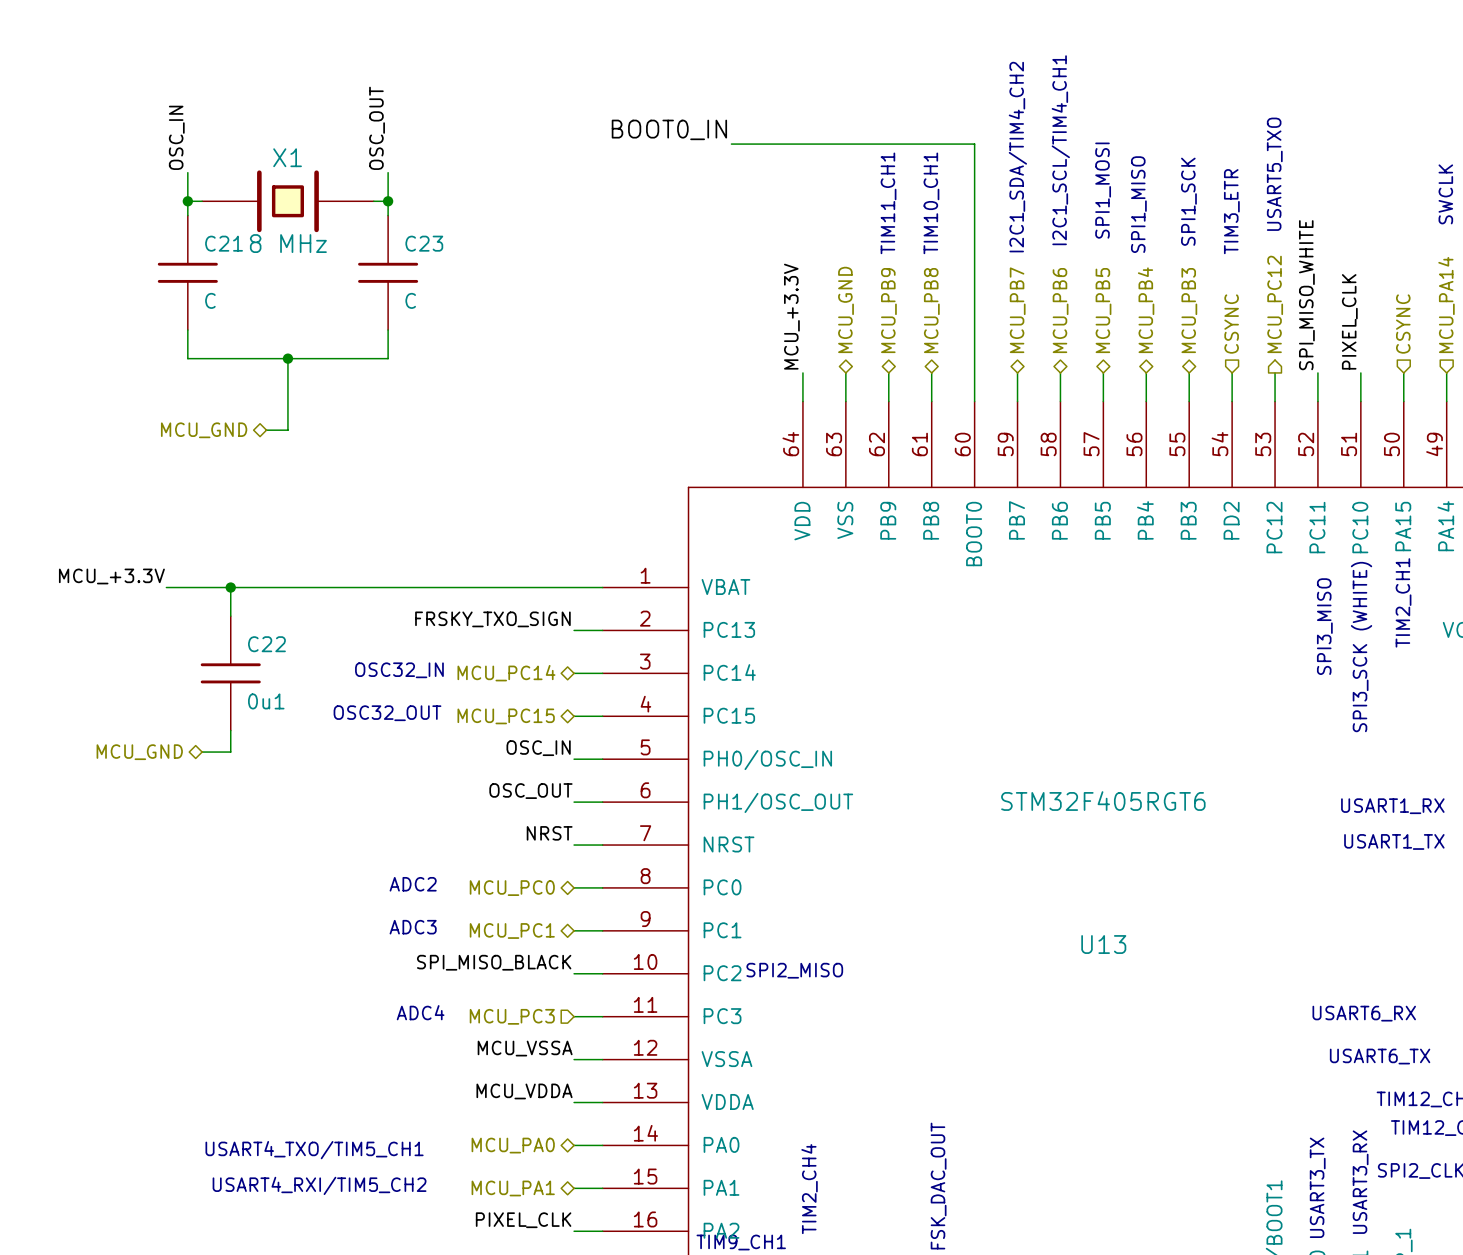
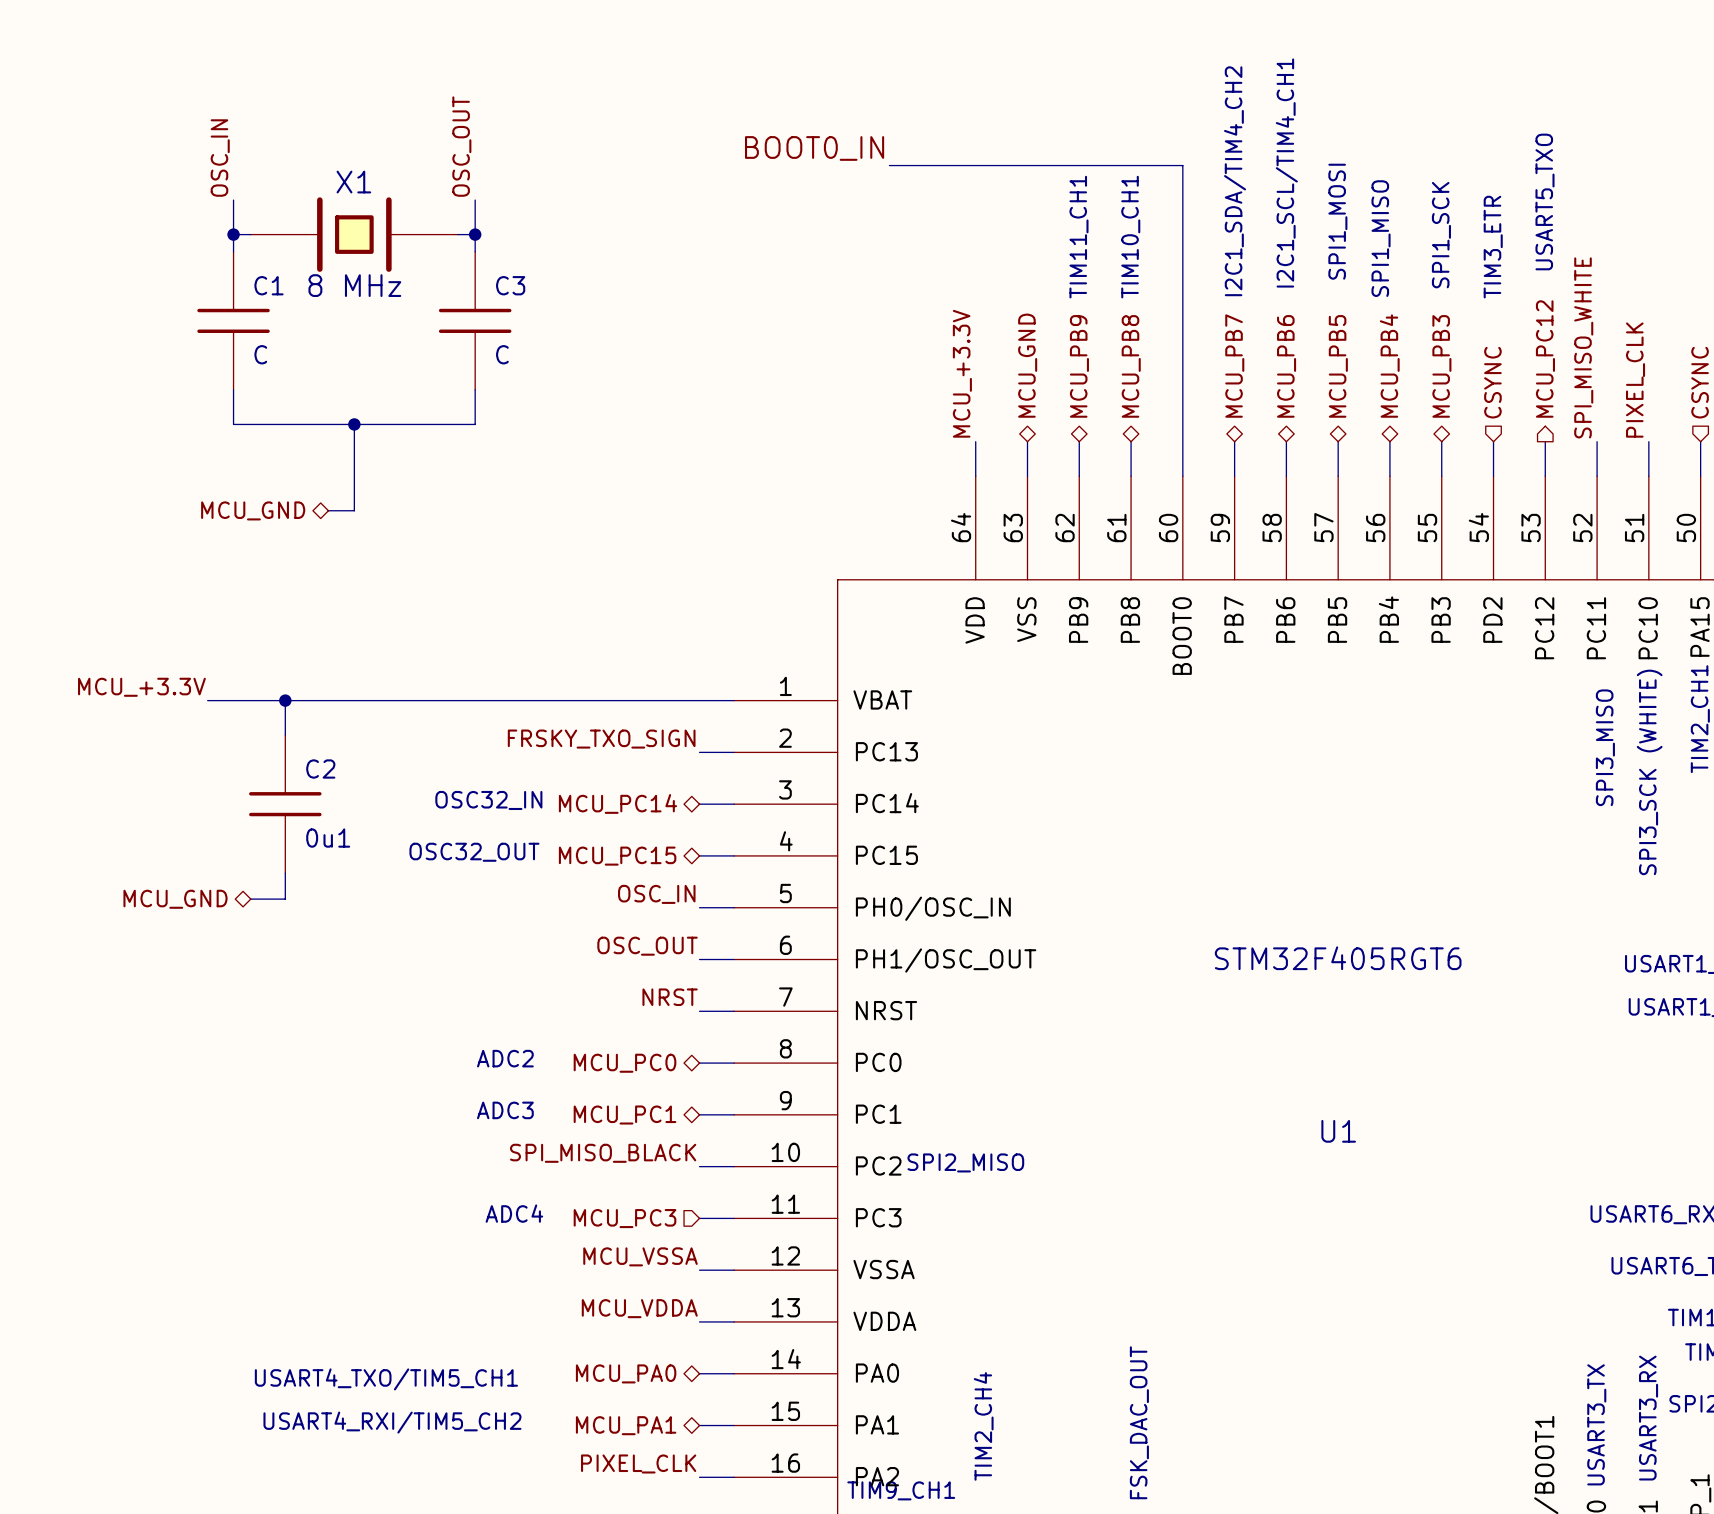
C21 name: C21 (224, 243) -> C1 (269, 285)
C23 name: C23 (424, 243) -> C3 (510, 285)
C22 name: C22 (266, 644) -> C2 (320, 769)
U13 name: U13 (1103, 944) -> U1 (1338, 1131)

